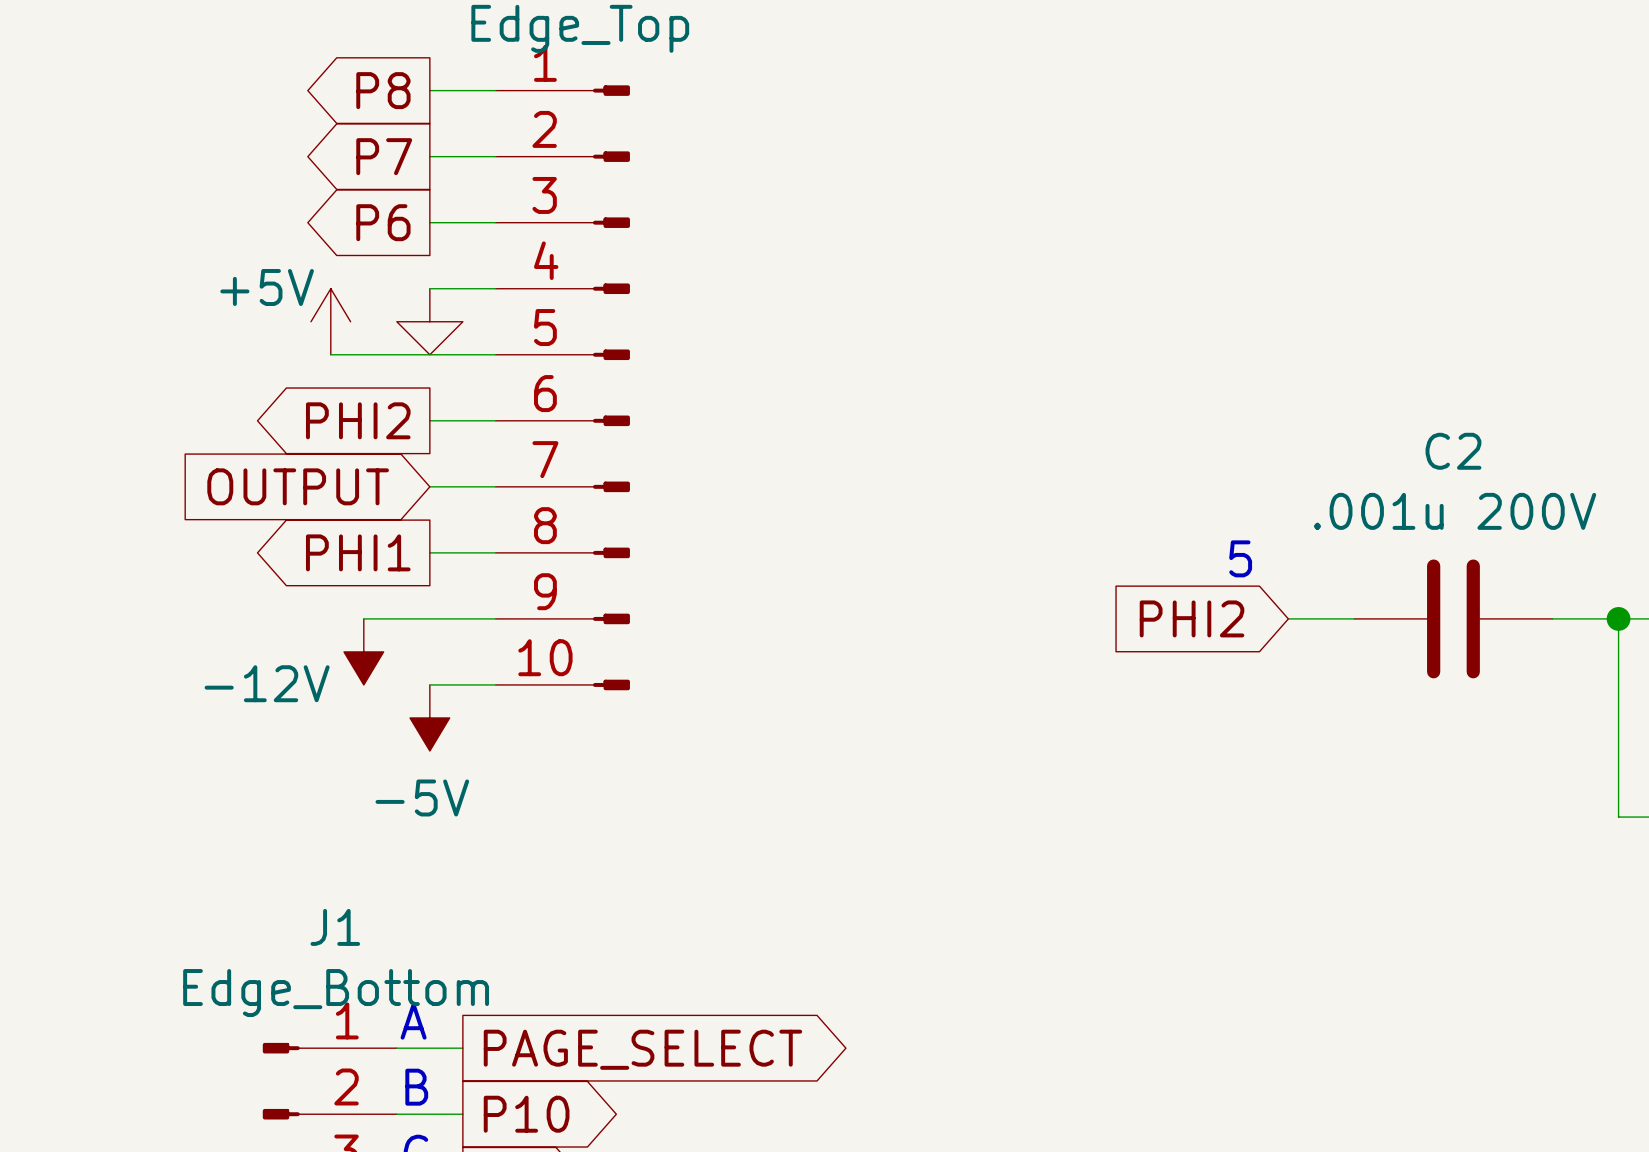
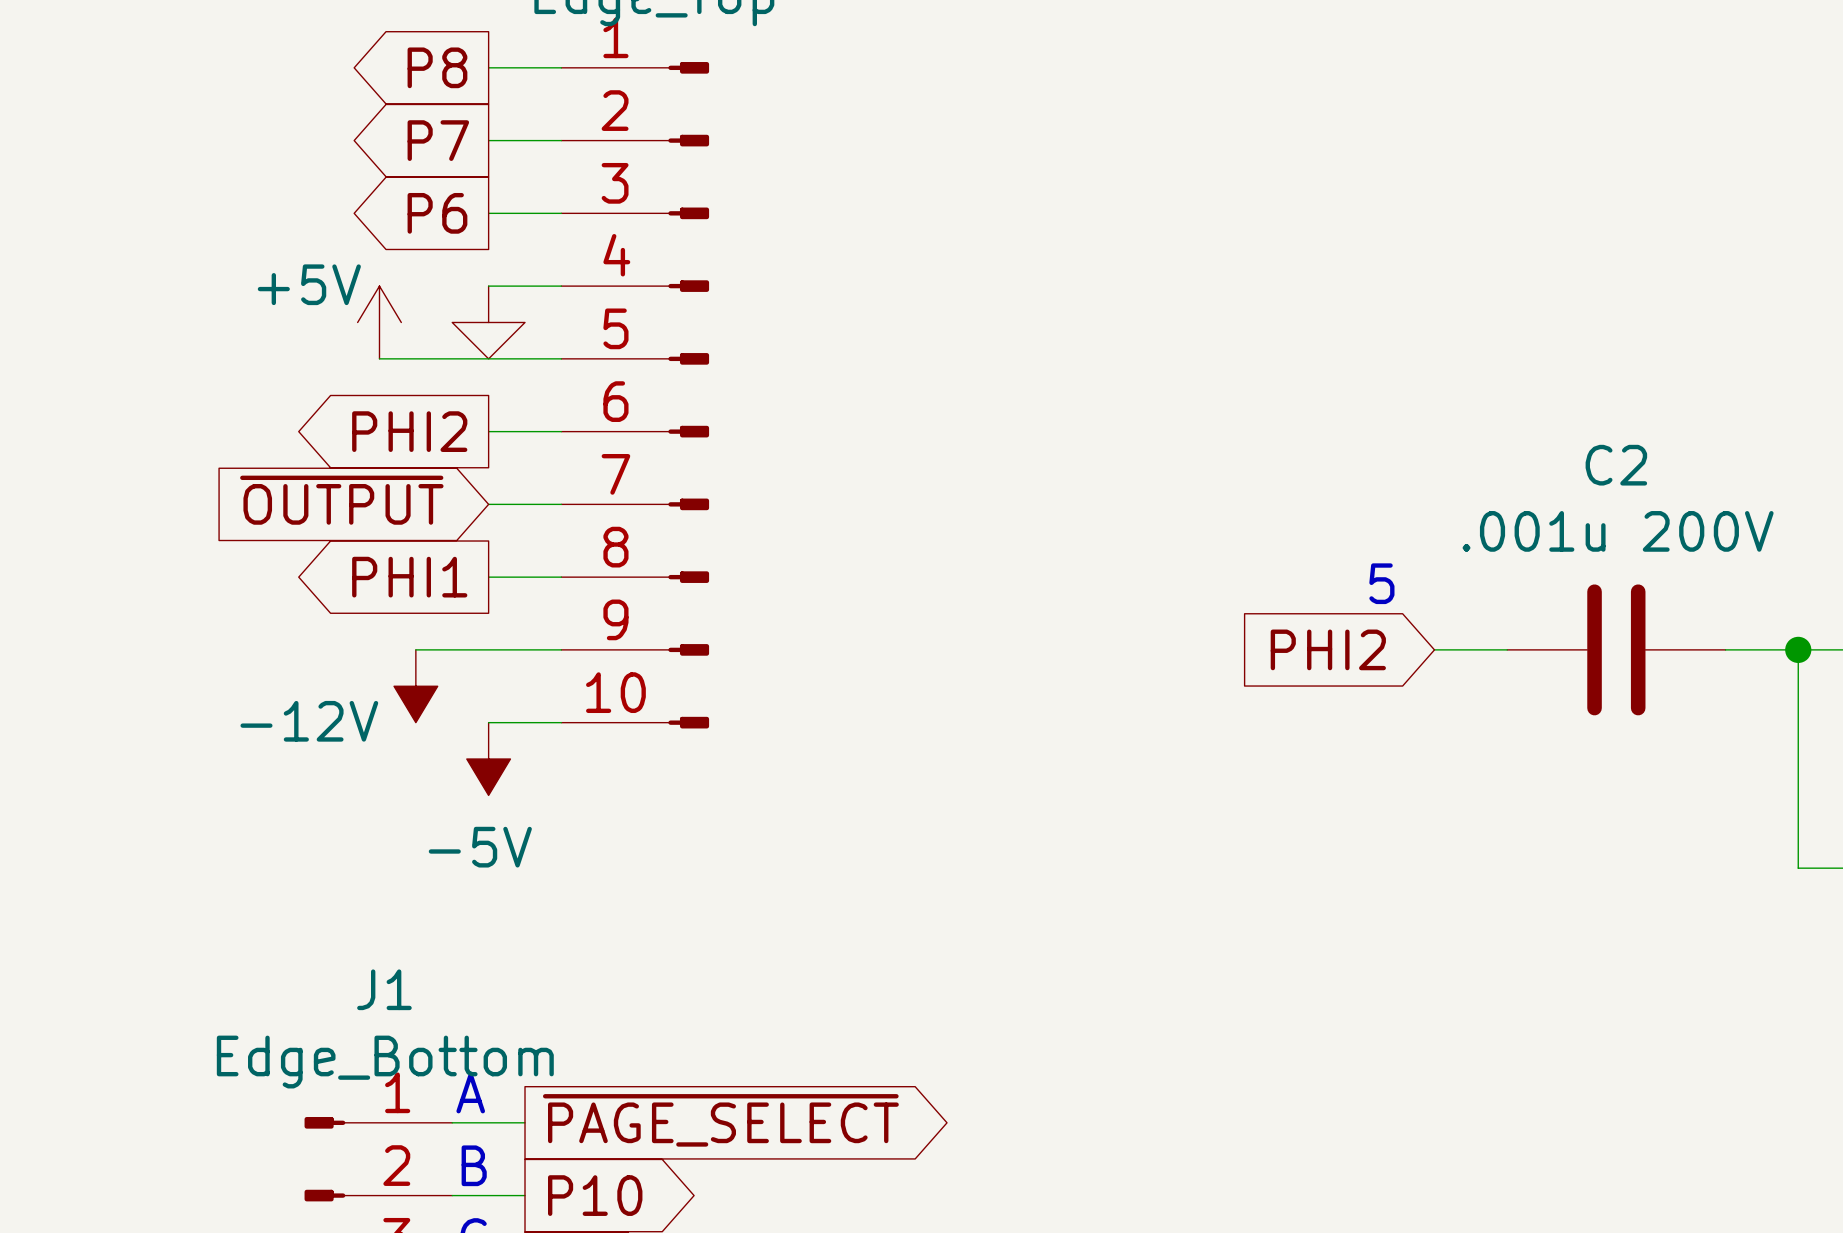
global label: OUTPUT (298, 486) -> ~{OUTPUT} (341, 500)
global label: PAGE_SELECT (642, 1049) -> ~{PAGE_SELECT} (720, 1120)

